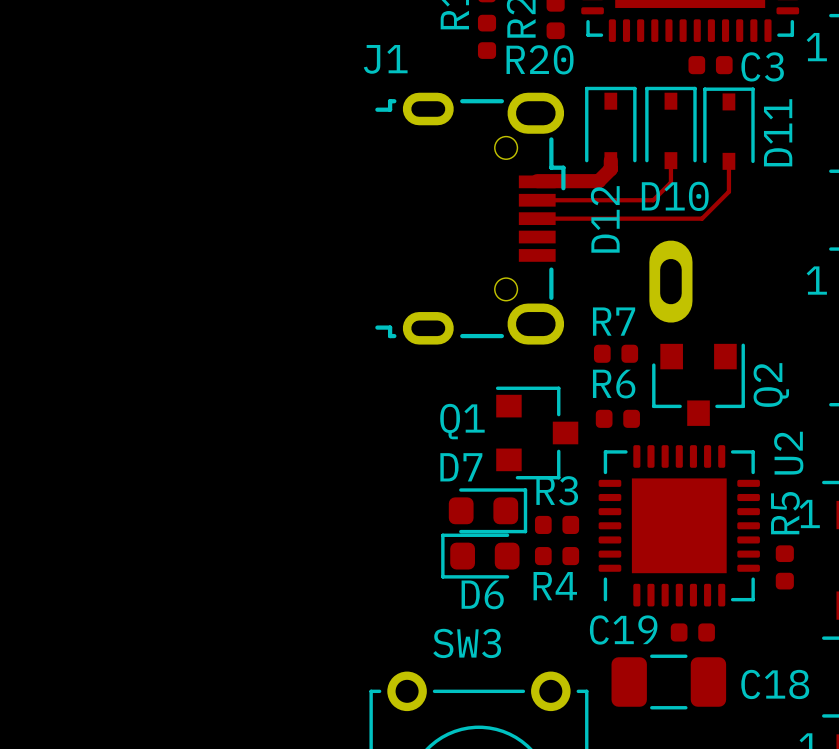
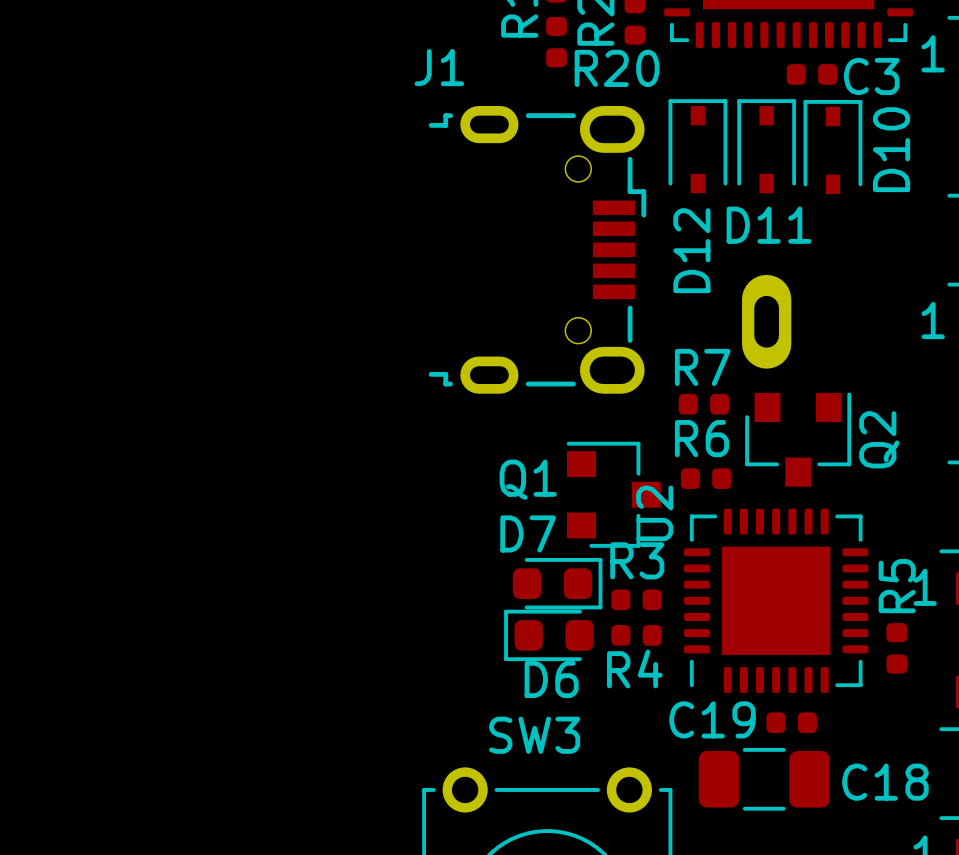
D11 name: D11 (778, 132) -> D10 (891, 149)
track: (610, 160) (610, 169) (598, 181) (537, 181) -> none
track: (670, 160) (670, 182) (653, 200) (537, 200) -> none
track: (728, 161) (728, 191) (702, 218) (537, 218) -> none
D10 name: D10 (675, 196) -> D11 (769, 225)
U2 name position: U2 (788, 453) -> U2 (654, 513)

